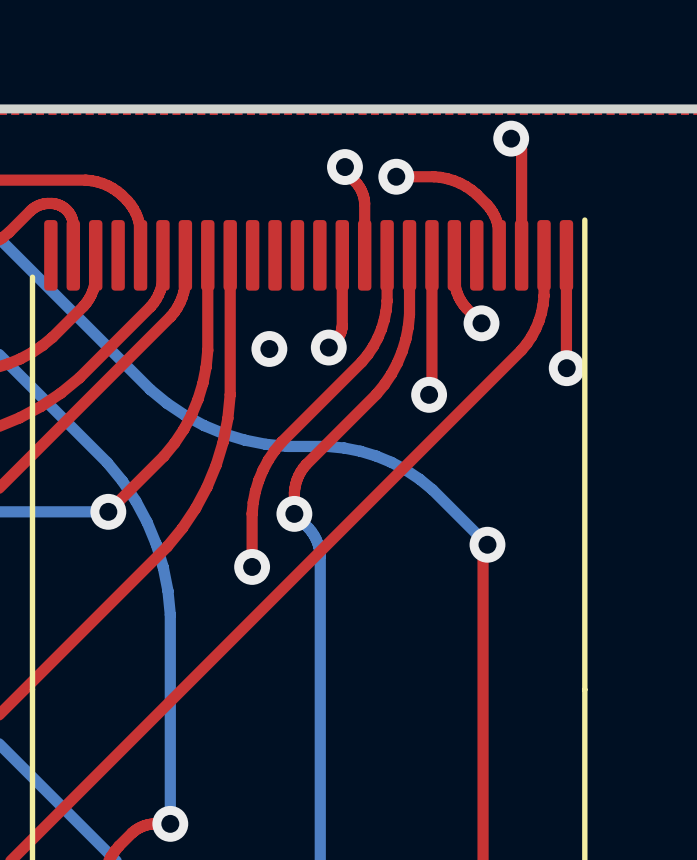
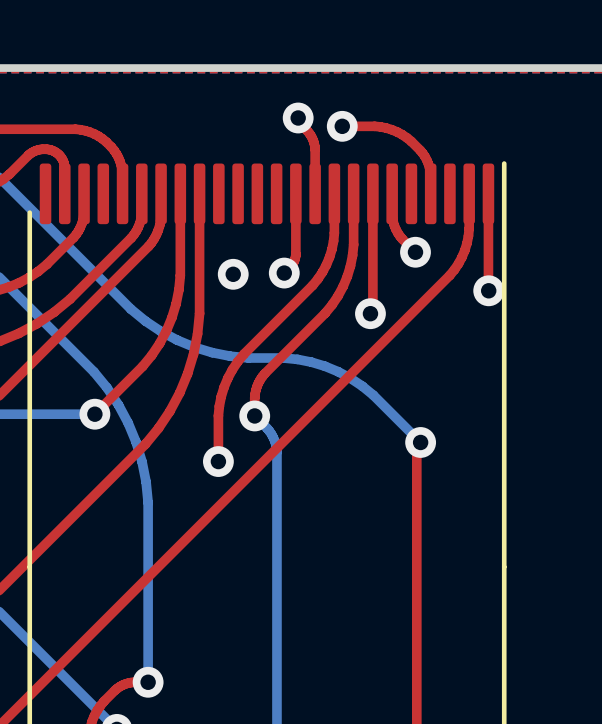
top track: (511, 138) (521, 149) (521, 255) -> none
via: (511, 138) -> none

